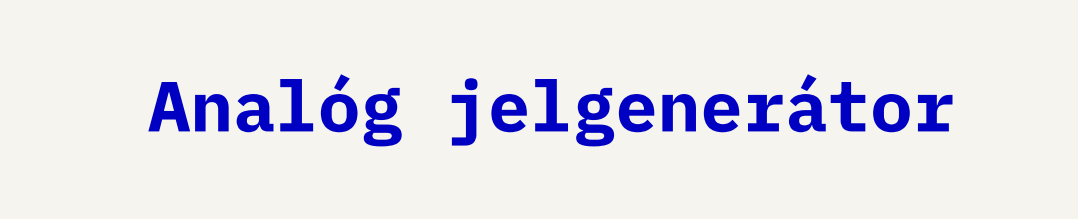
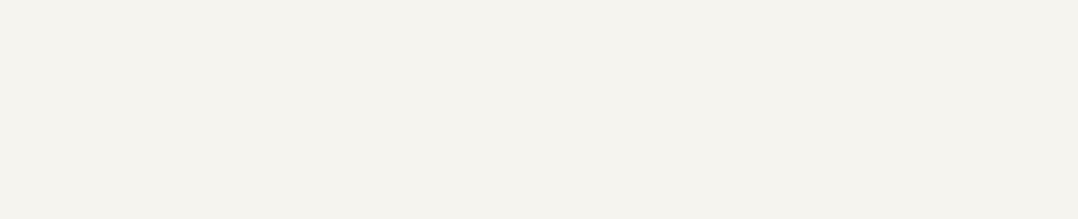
text: Analóg jelgenerátor (550, 110) -> none

